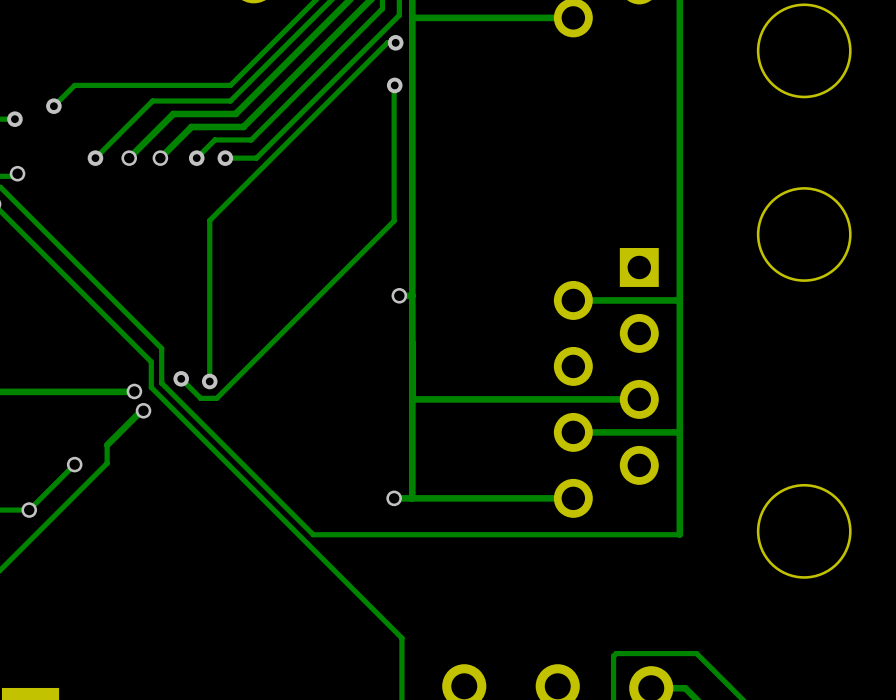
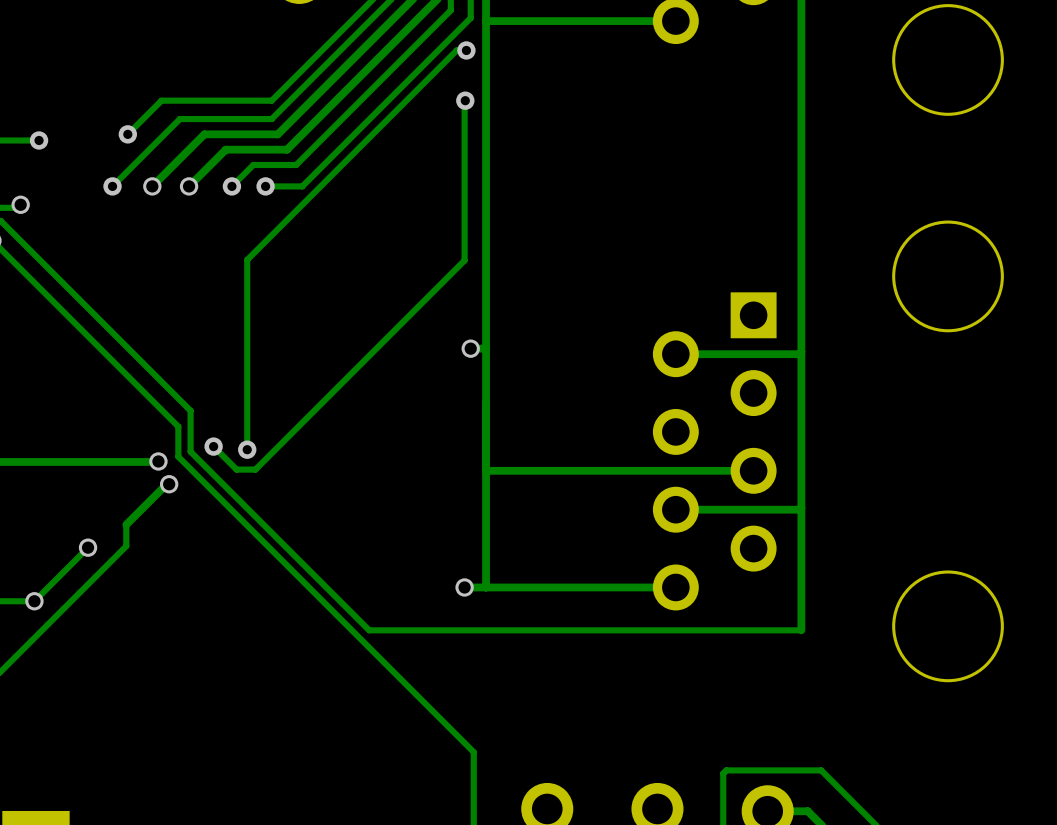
track: (137, 85) (74, 85) (53, 106) -> (161, 100) (127, 134)
via: (53, 106) -> none
via: none -> (127, 134)
via: (14, 119) -> none
track: none -> (39, 140) (17, 140)
via: none -> (39, 140)

